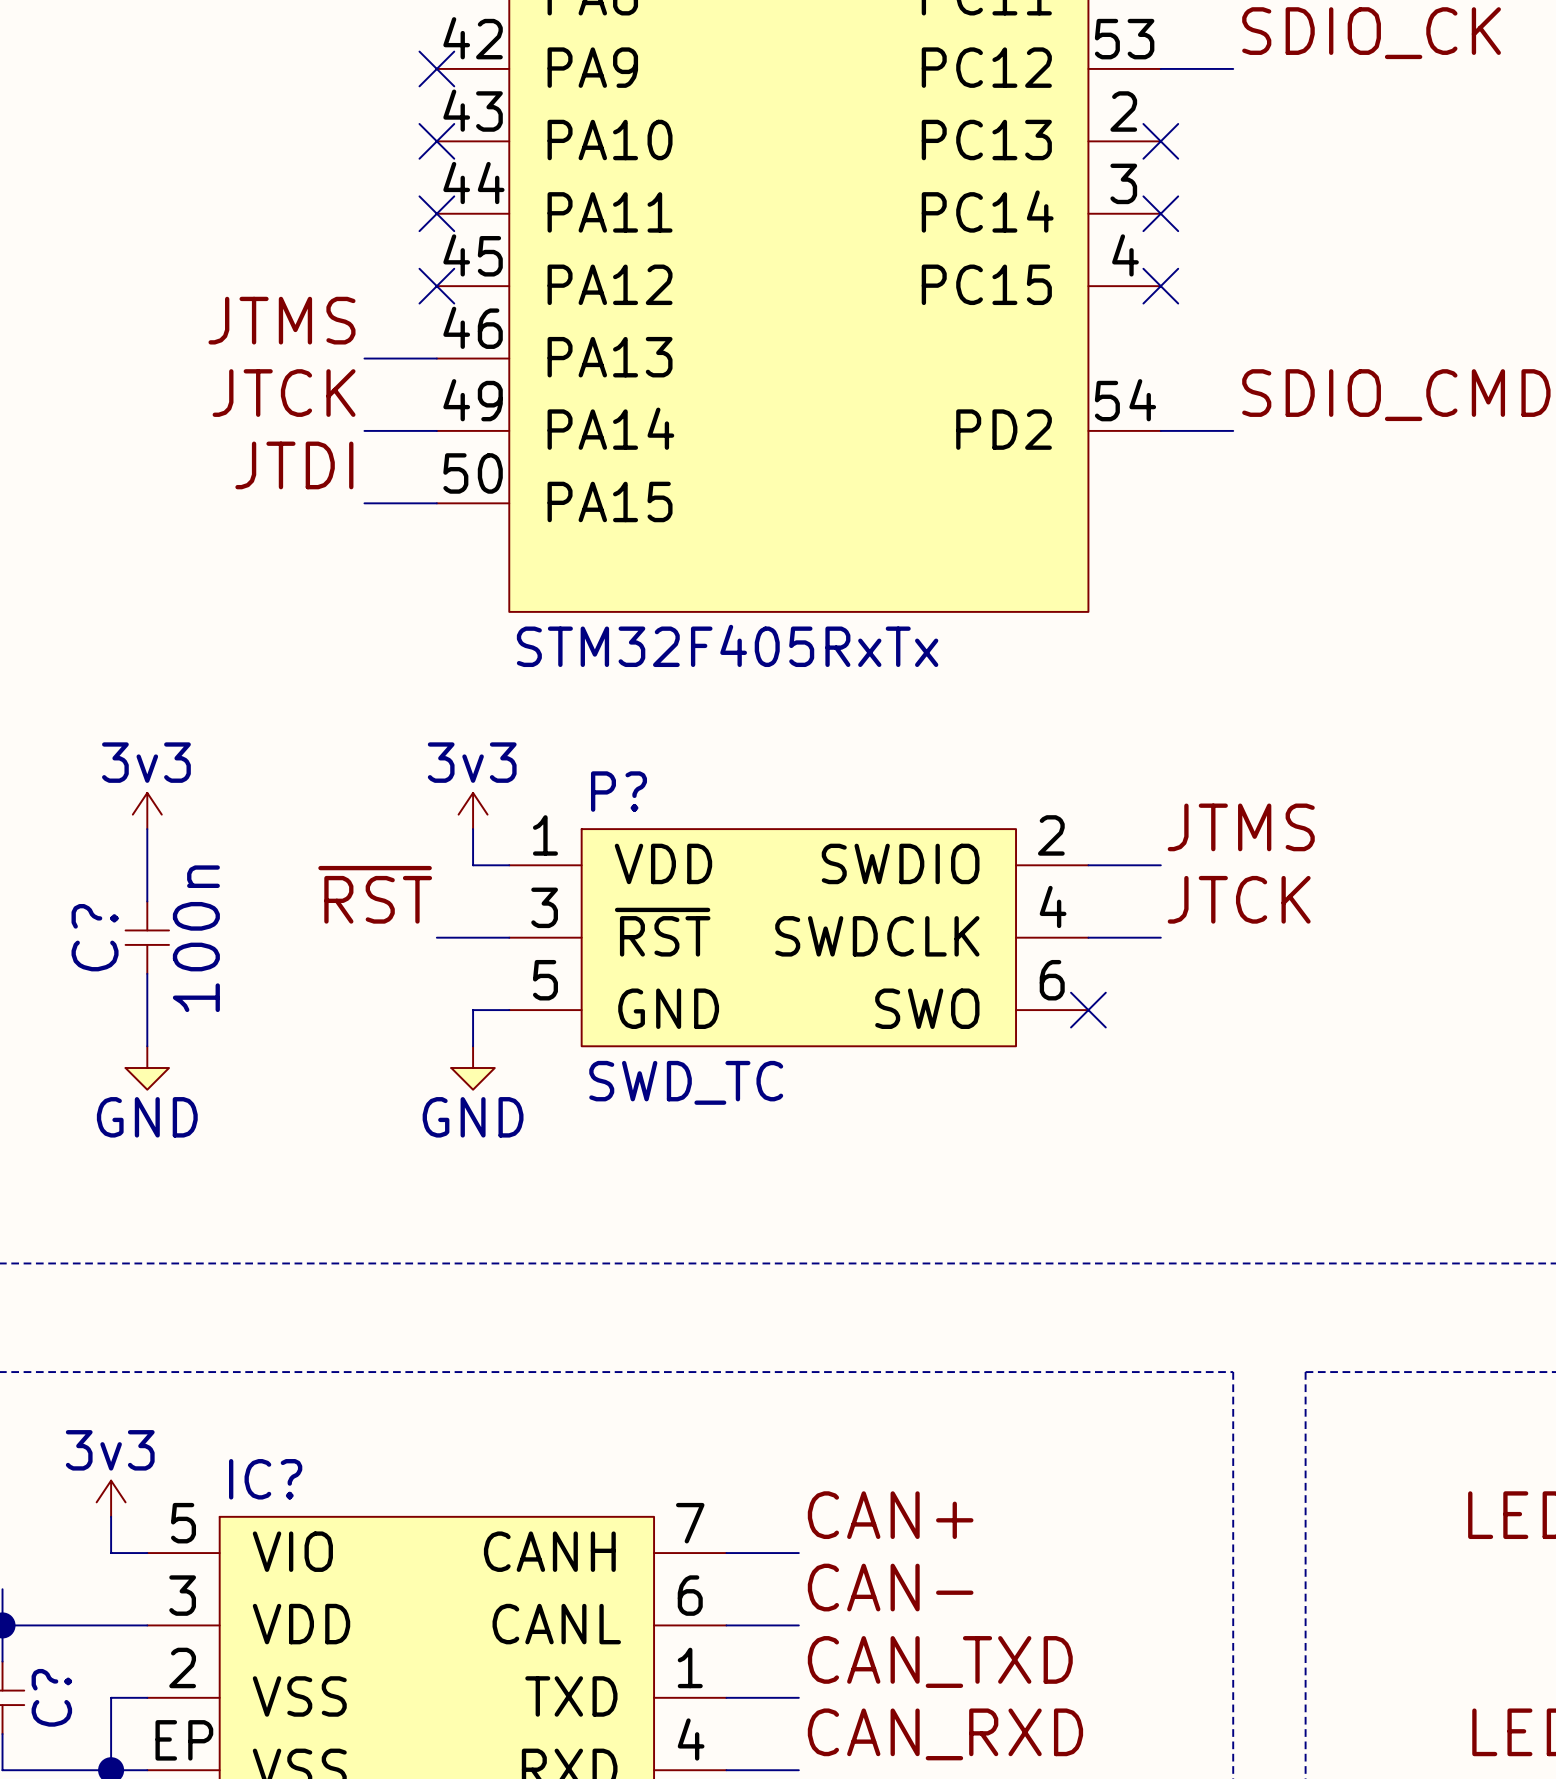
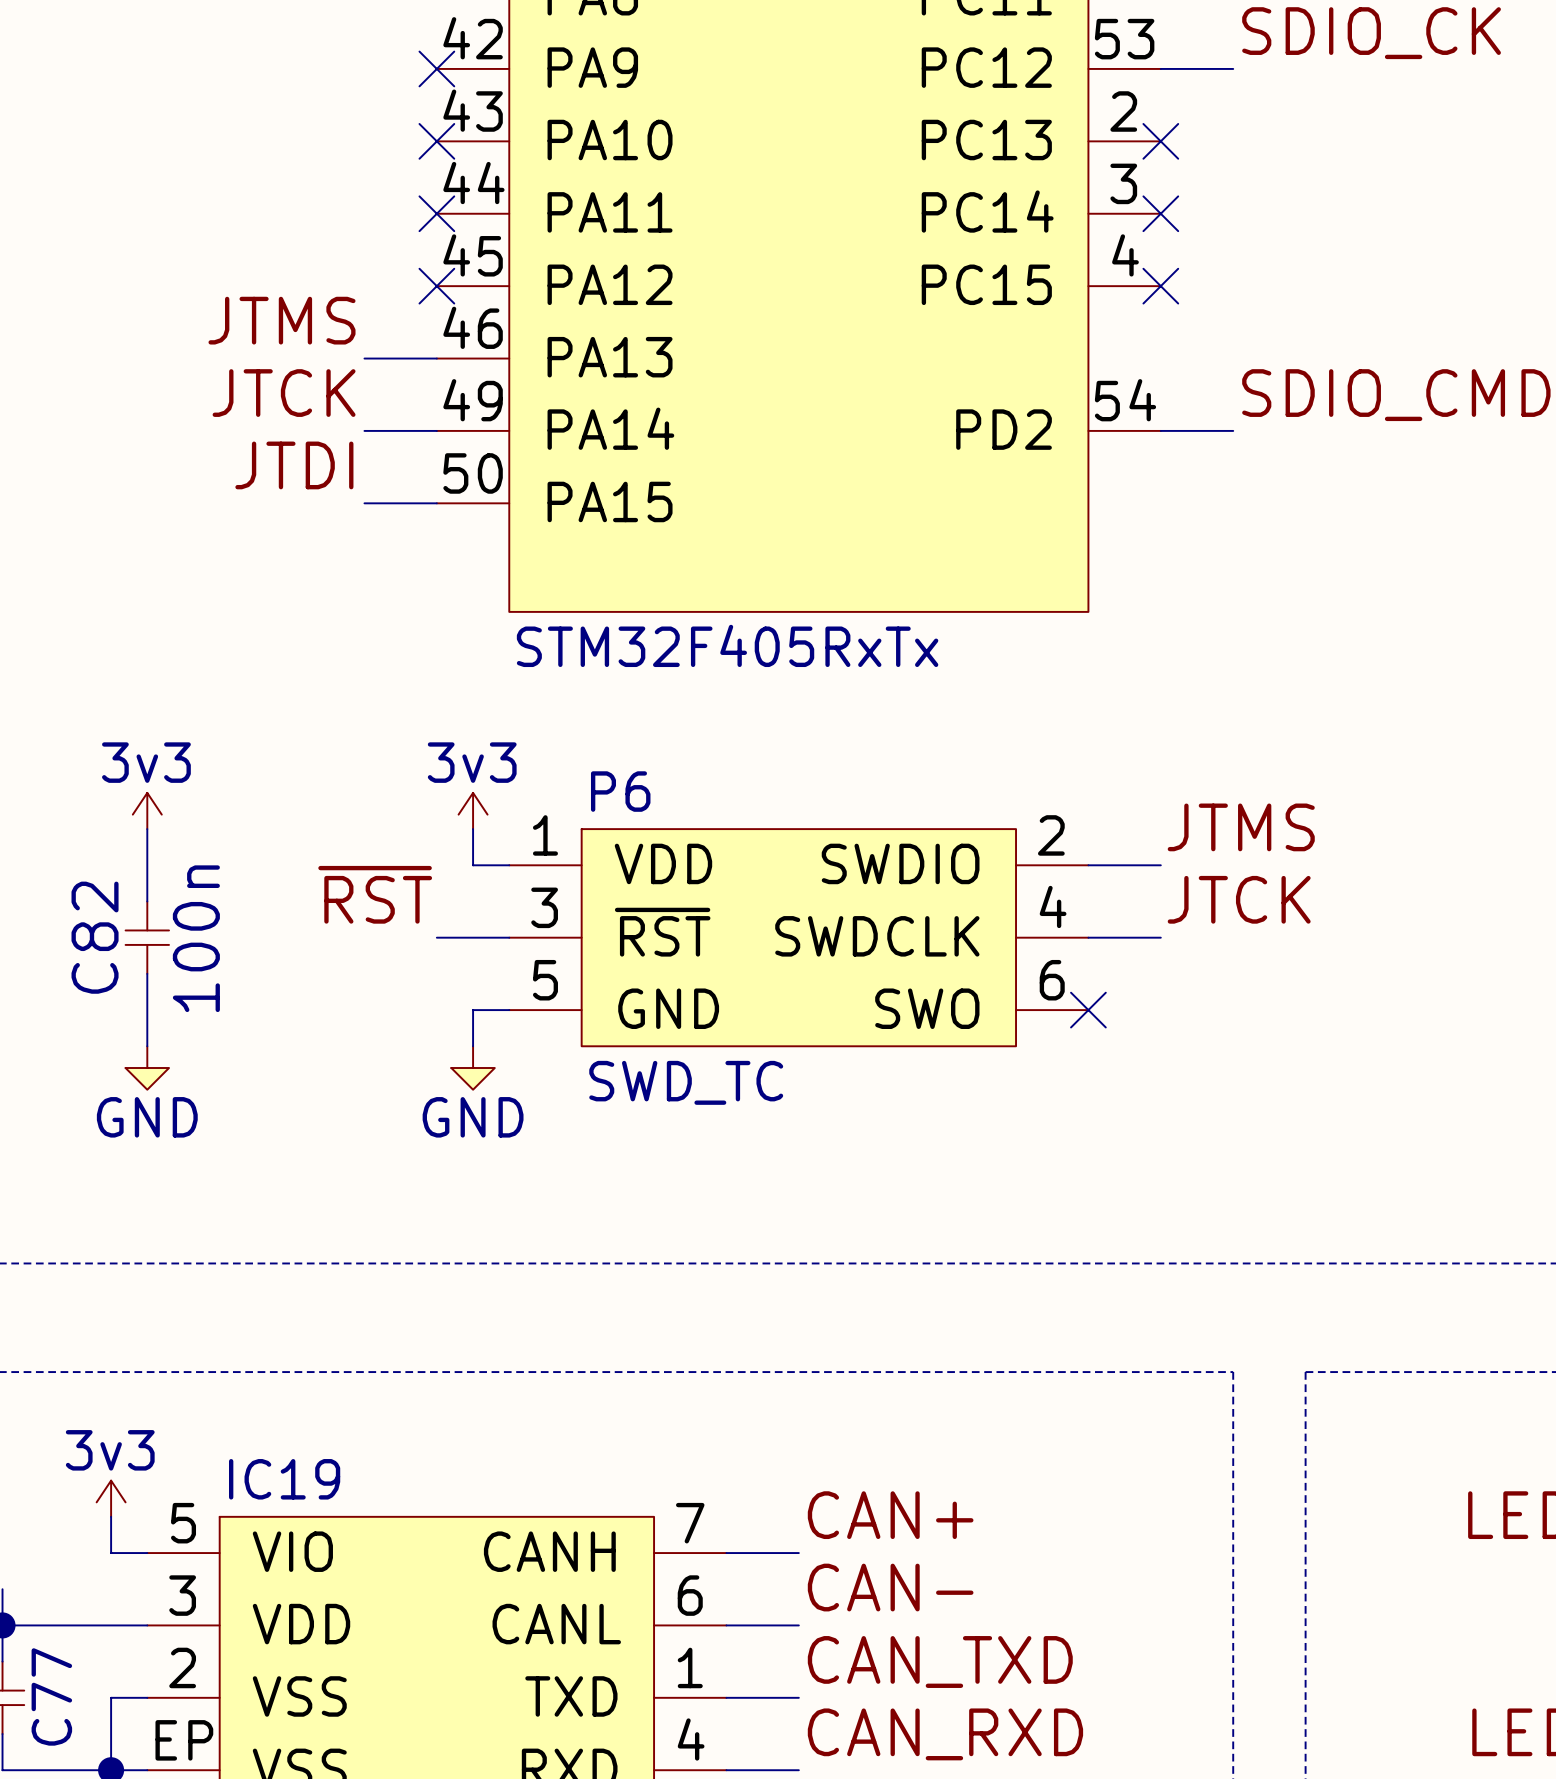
P? name: P? (618, 791) -> P6 (620, 791)
C? name: C? (95, 937) -> C82 (95, 937)
IC? name: IC? (265, 1479) -> IC19 (284, 1479)
C? name: C? (51, 1697) -> C77 (51, 1696)

